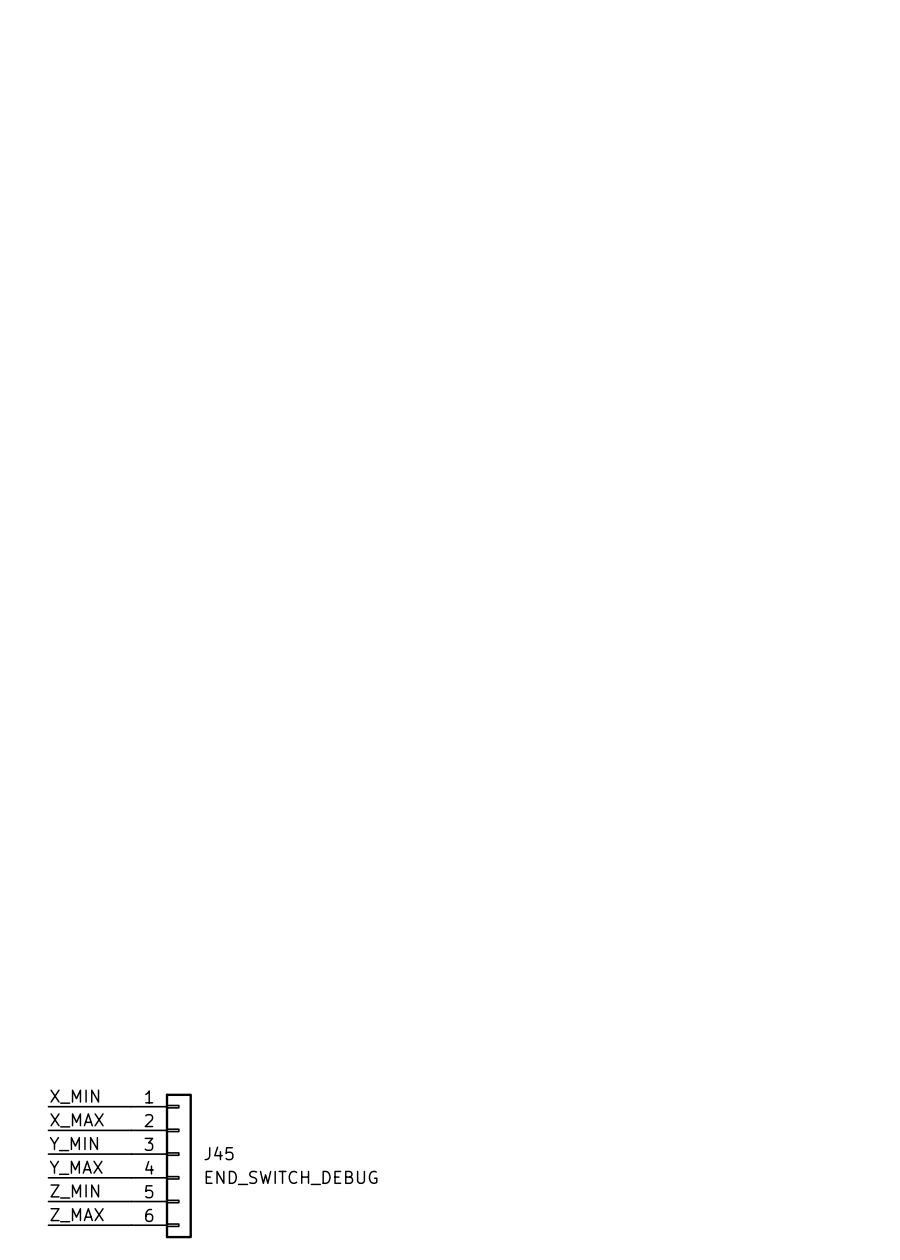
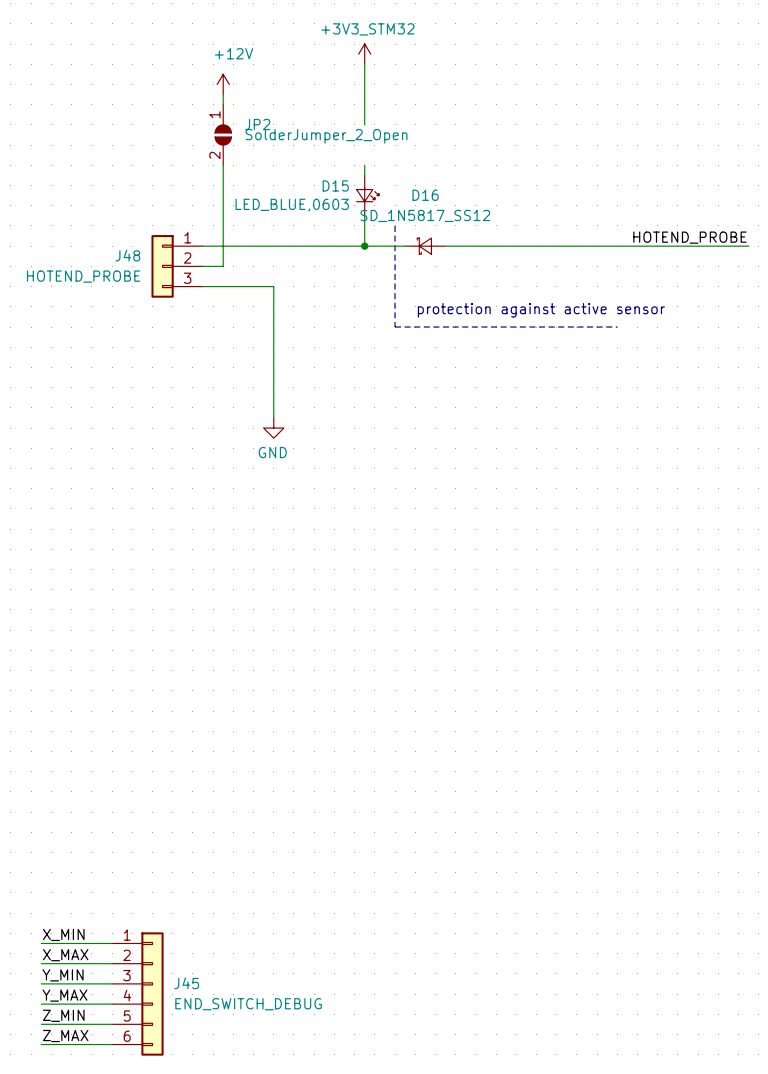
power symbol: none -> +3V3_STM32 (364, 54)
wire: none -> (364, 64) (364, 124)
power symbol: none -> +12V (223, 84)
wire: none -> (223, 94) (223, 104)
JP2: none -> SolderJumper_2_Open (223, 134)
wire: none -> (223, 165) (223, 266) (203, 266)
wire: none -> (364, 165) (364, 175)
D15: none -> LED_BLUE,0603 (367, 195)
wire: none -> (364, 215) (364, 246)
line: none -> (395, 225) (395, 327) (617, 327)
label: none -> HOTEND_PROBE (689, 237)
wire: none -> (203, 246) (405, 246)
junction: none -> (364, 246)
D16: none -> SD_1N5817_SS12 (425, 246)
wire: none -> (445, 246) (748, 246)
J48: none -> HOTEND_PROBE (177, 266)
wire: none -> (203, 286) (273, 286) (273, 417)
text: none -> protection against active sensor (541, 310)
power symbol: none -> GND (273, 428)

